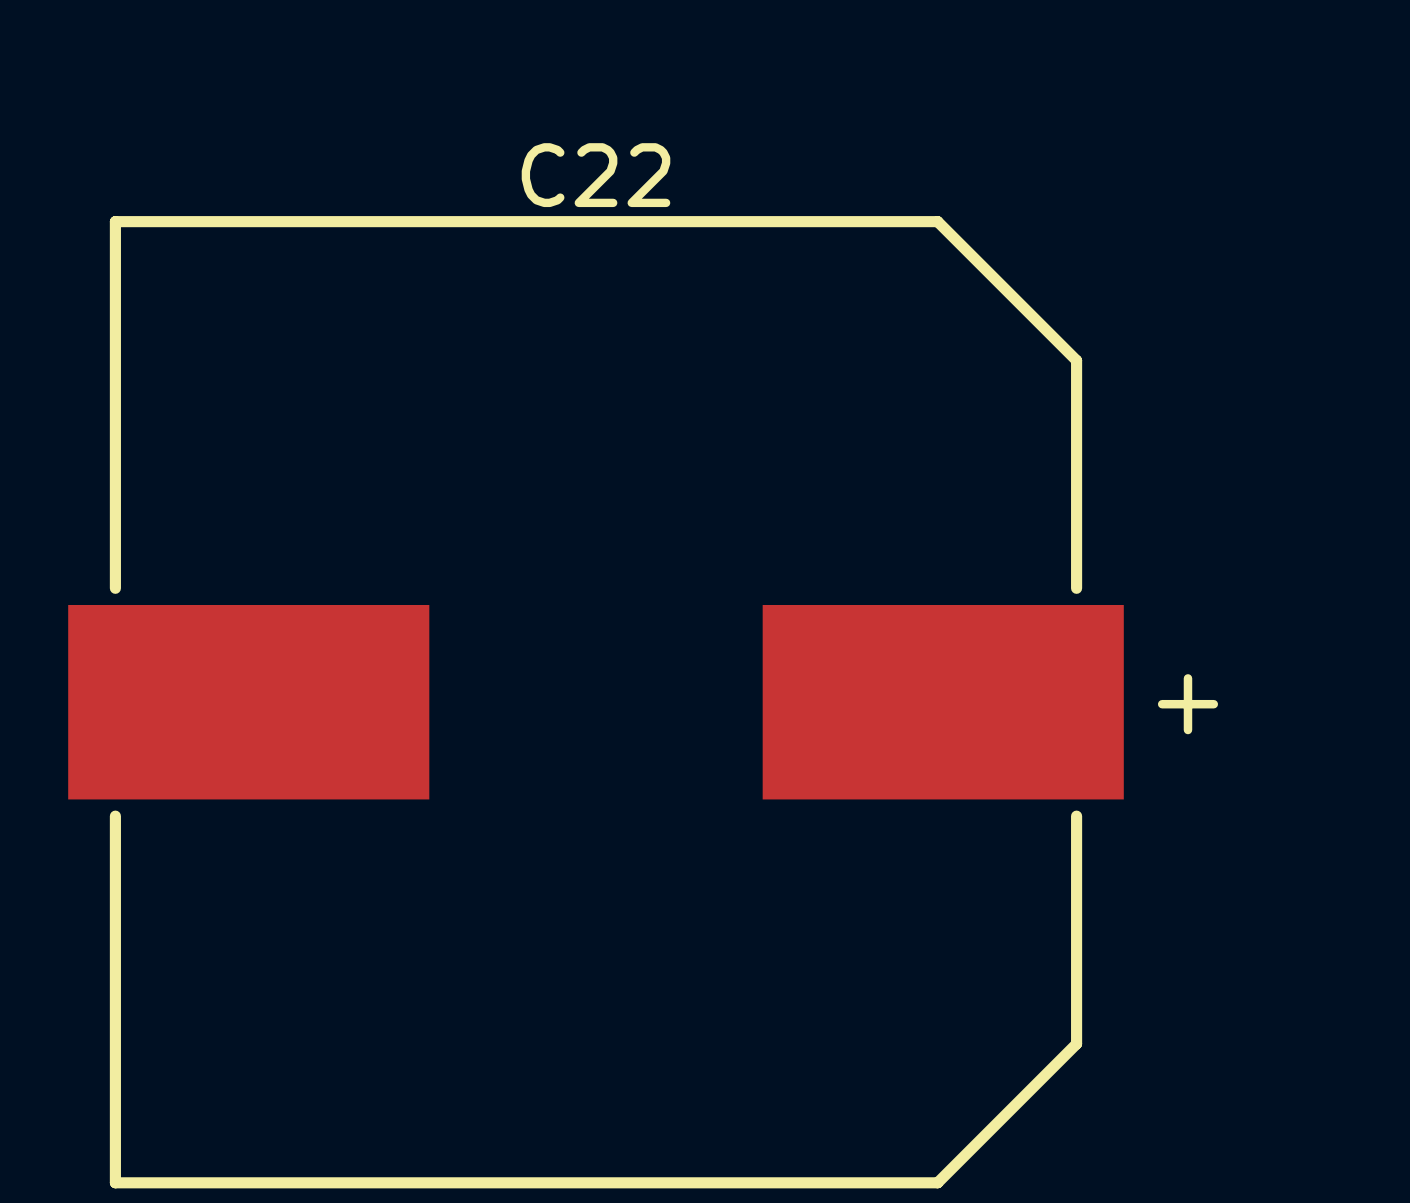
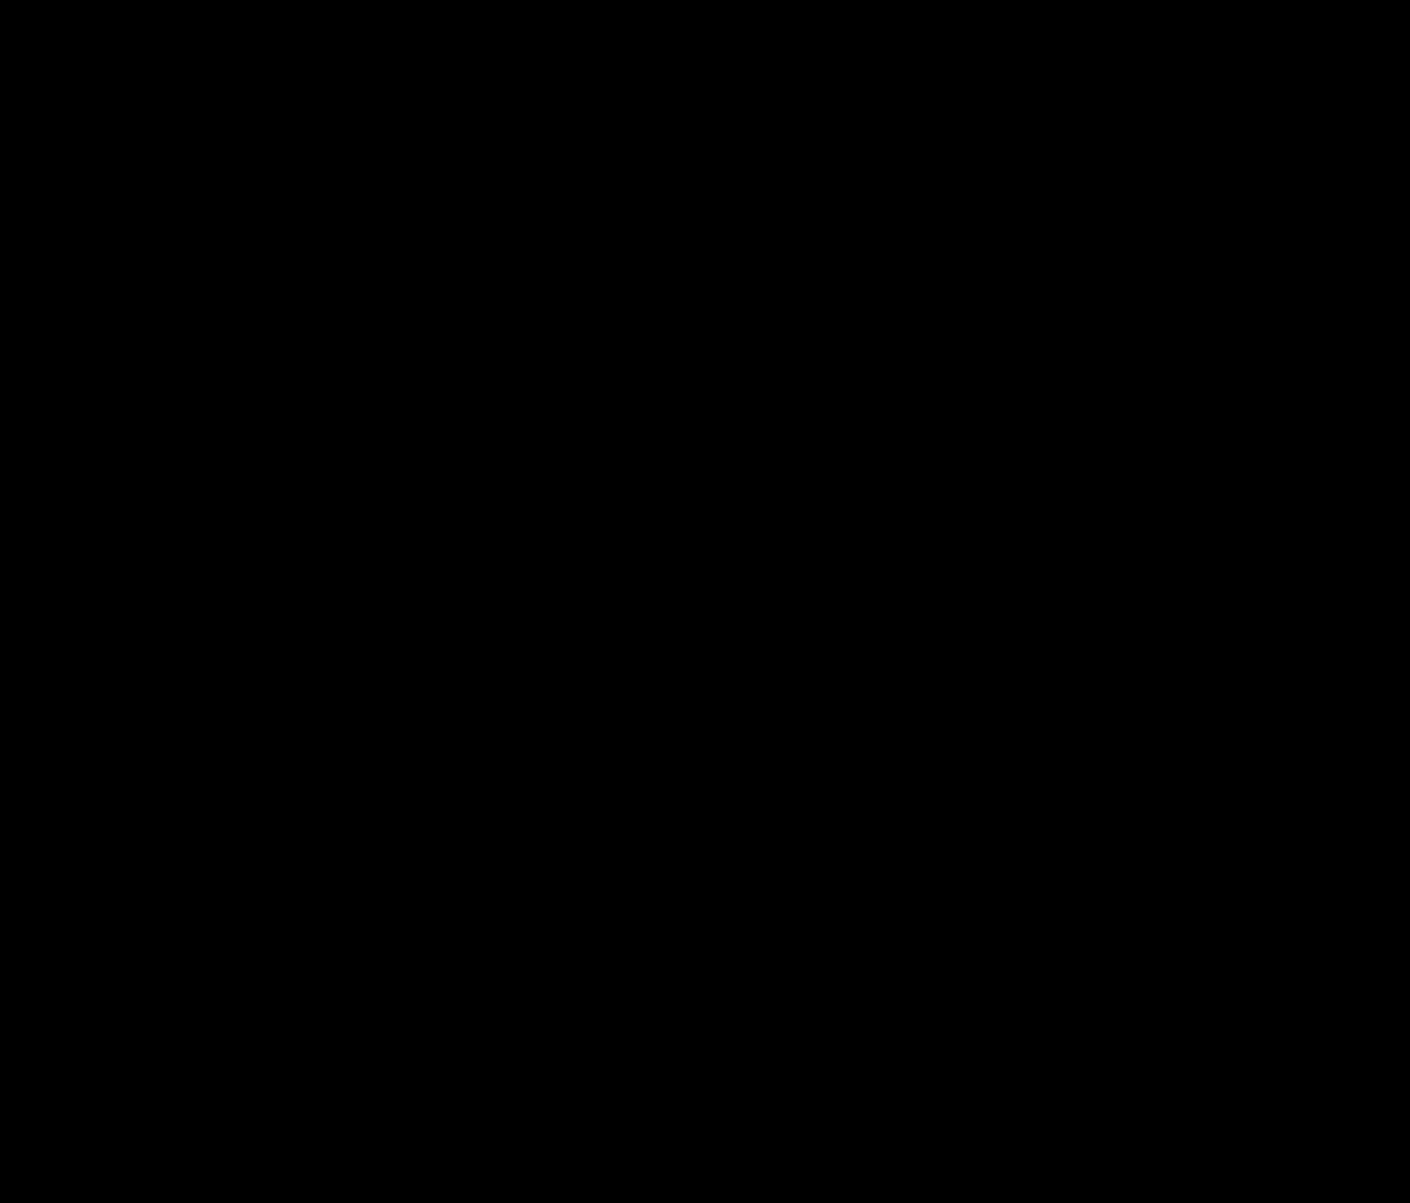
C22: (596, 702) -> none

